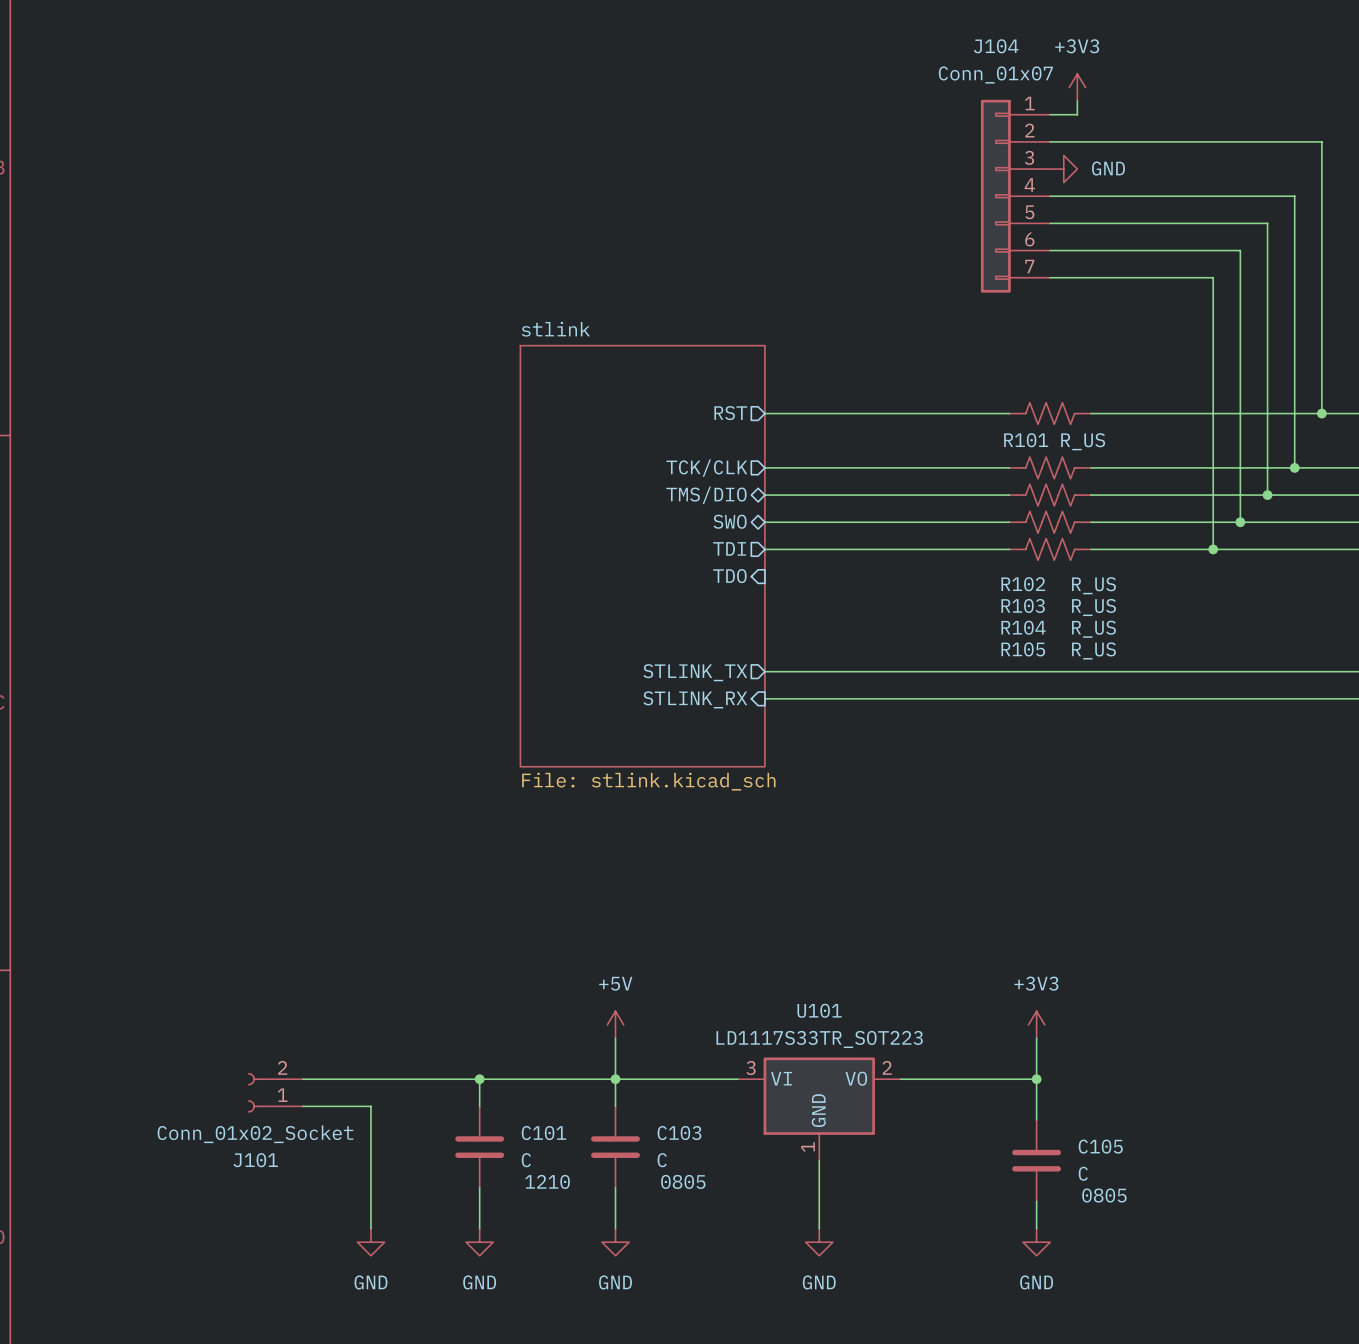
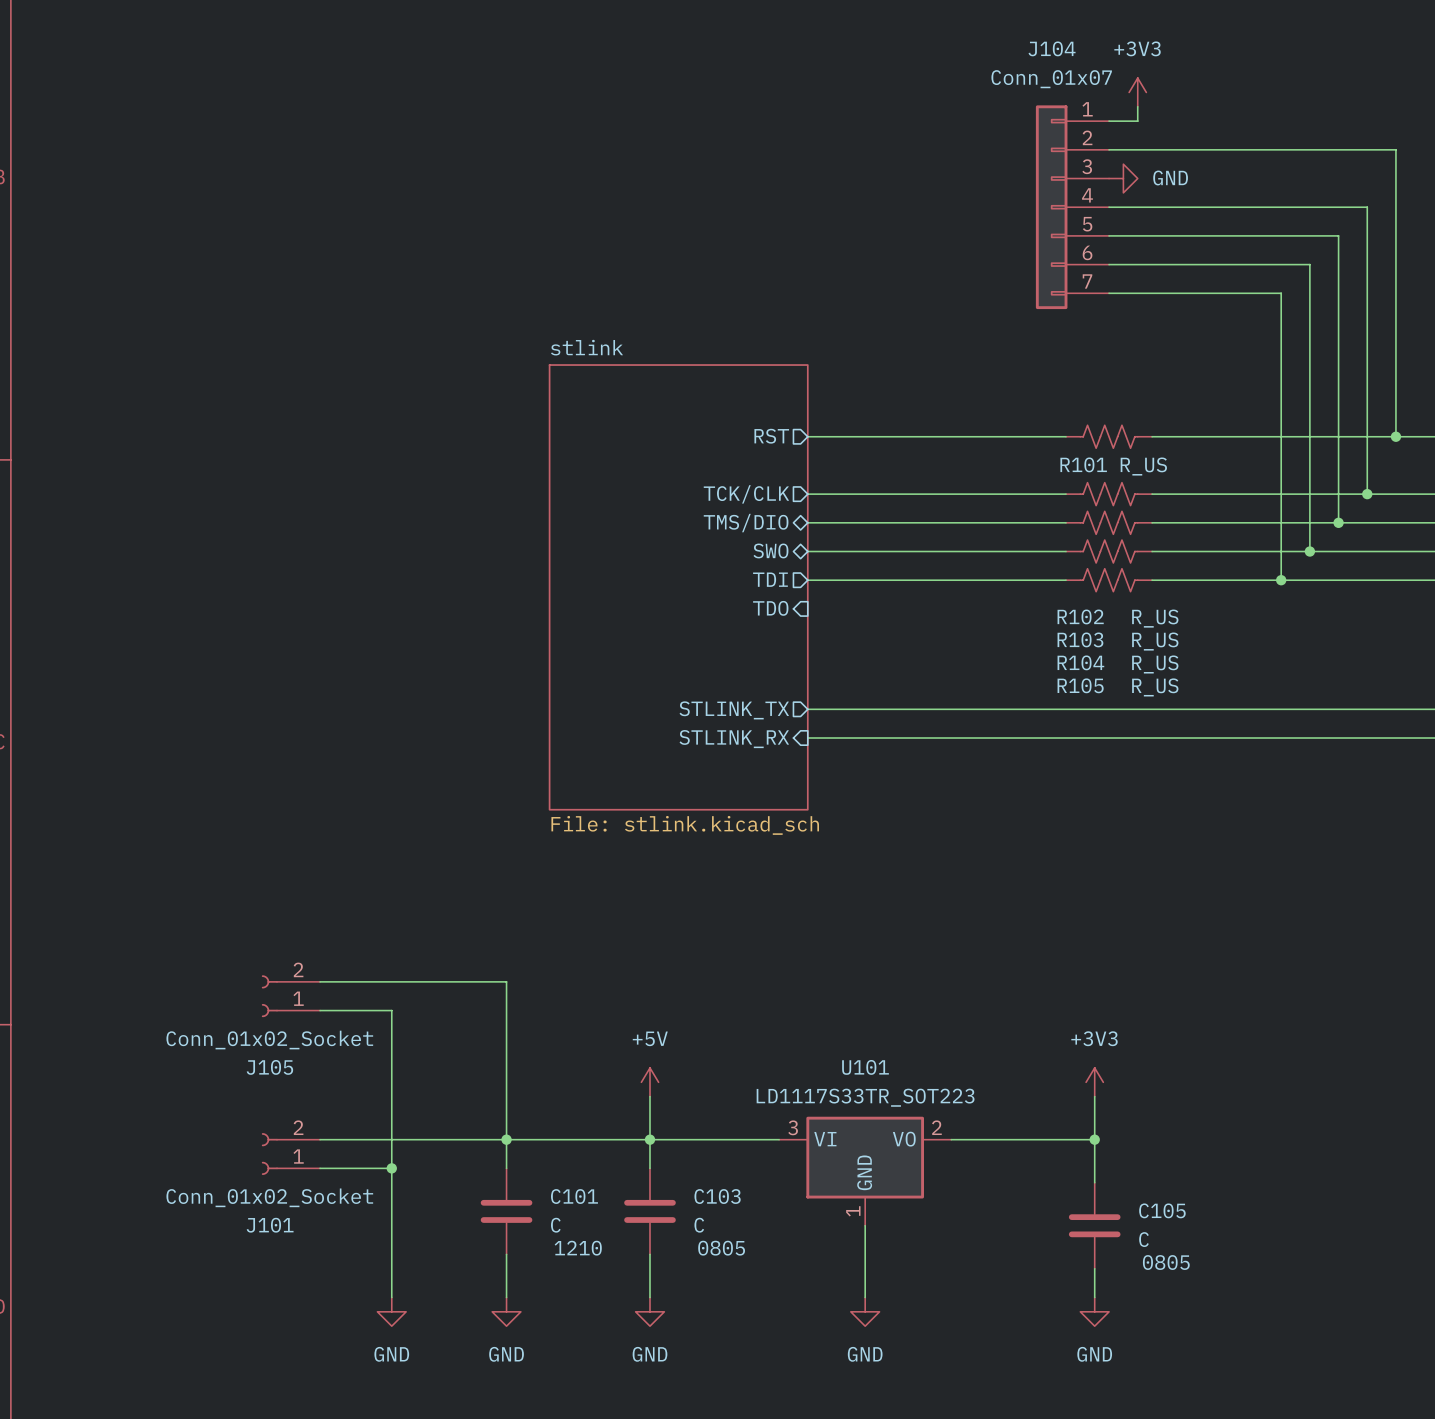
wire: none -> (320, 981) (506, 981) (506, 1139)
J105: none -> Conn_01x02_Socket (290, 996)
wire: none -> (320, 1010) (391, 1010) (391, 1168)
junction: none -> (391, 1168)

